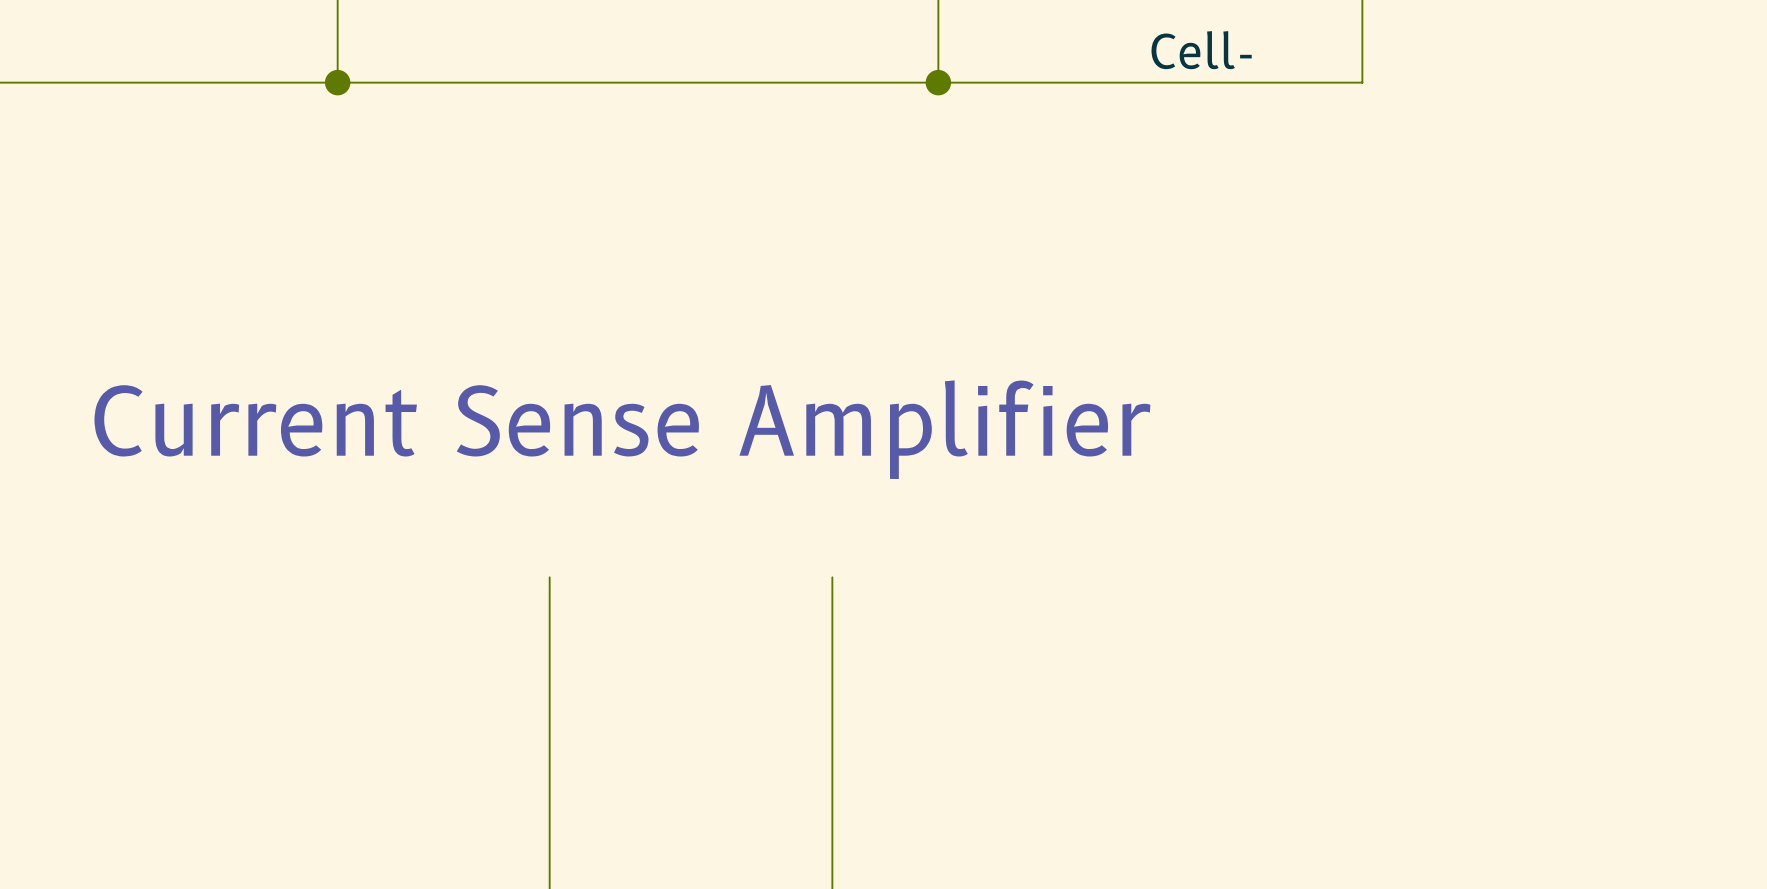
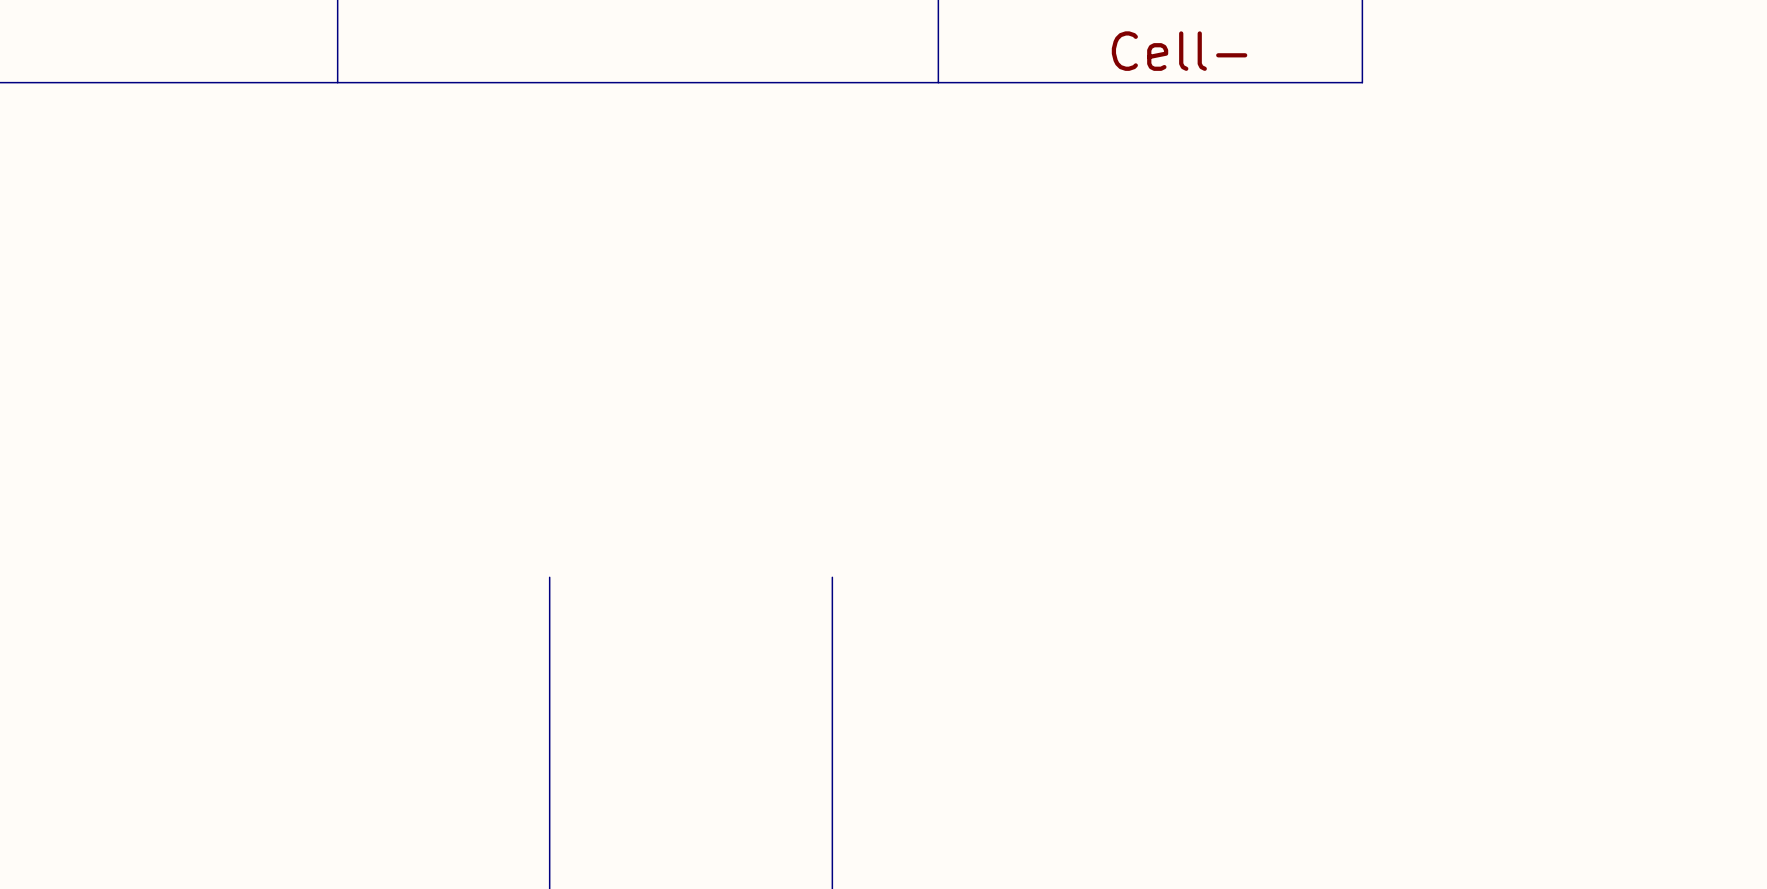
junction: (337, 82) -> none
junction: (938, 82) -> none
text: Current Sense Amplifier (622, 429) -> none

